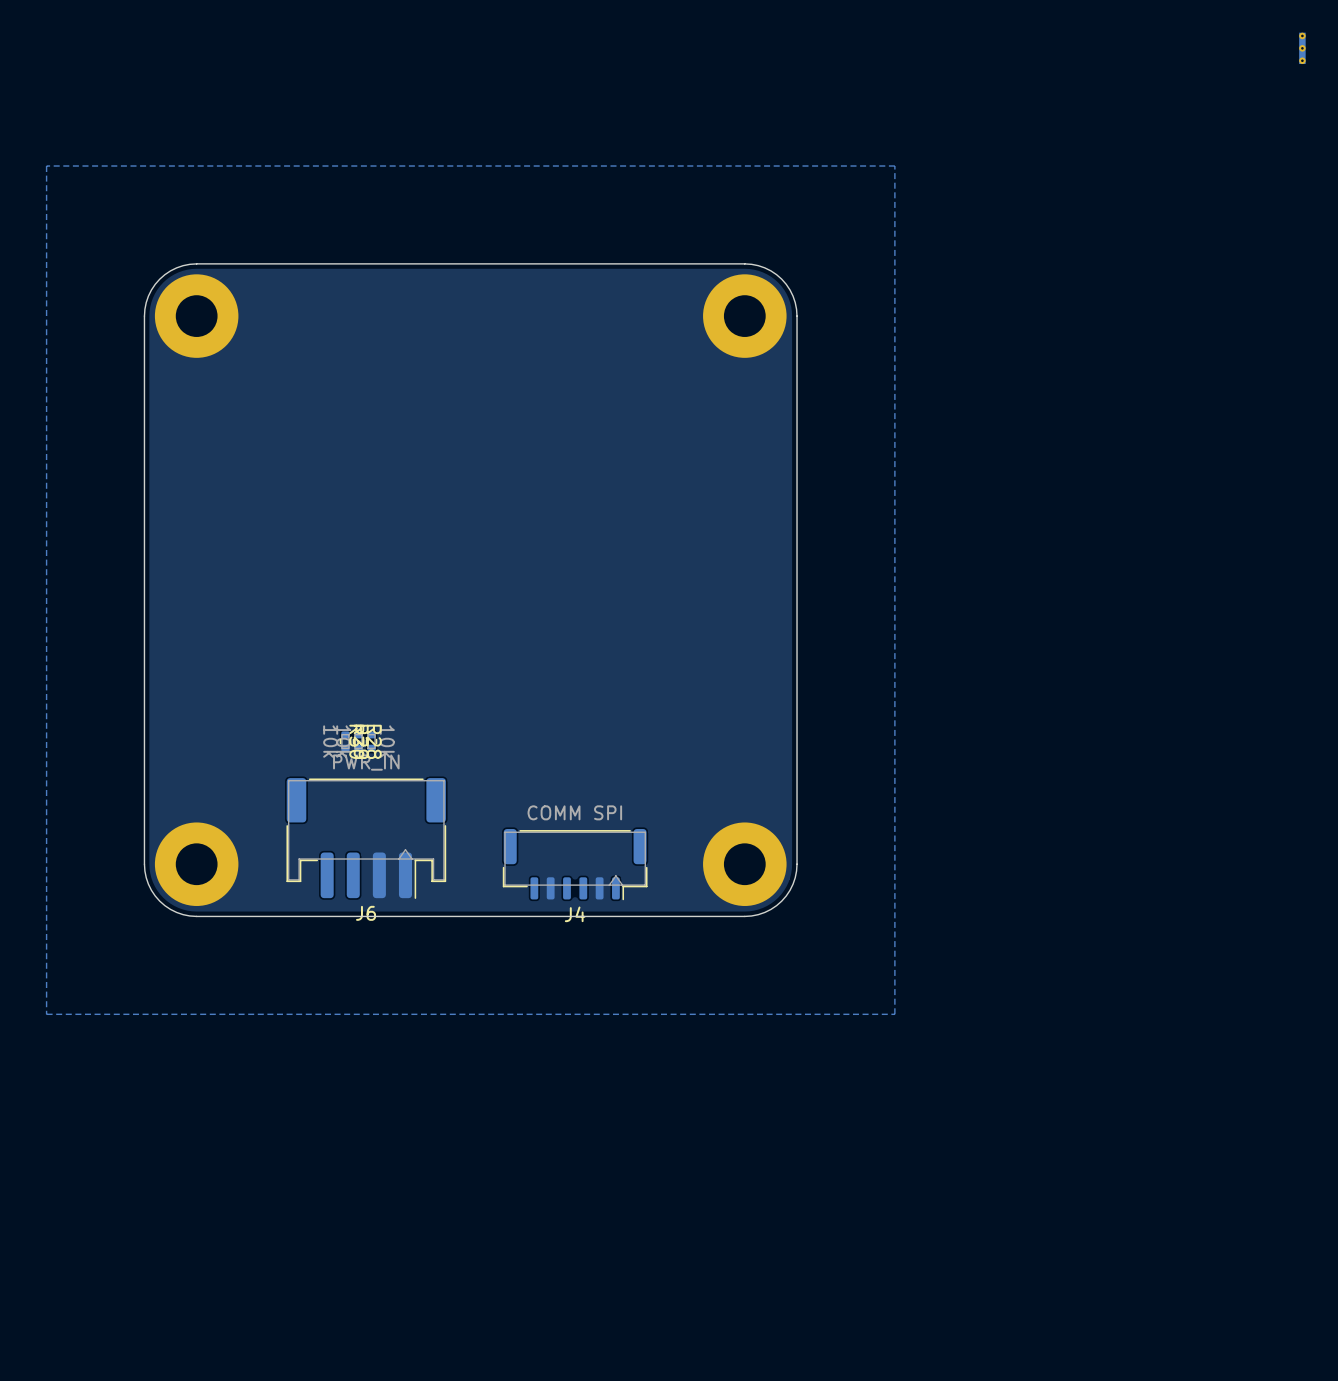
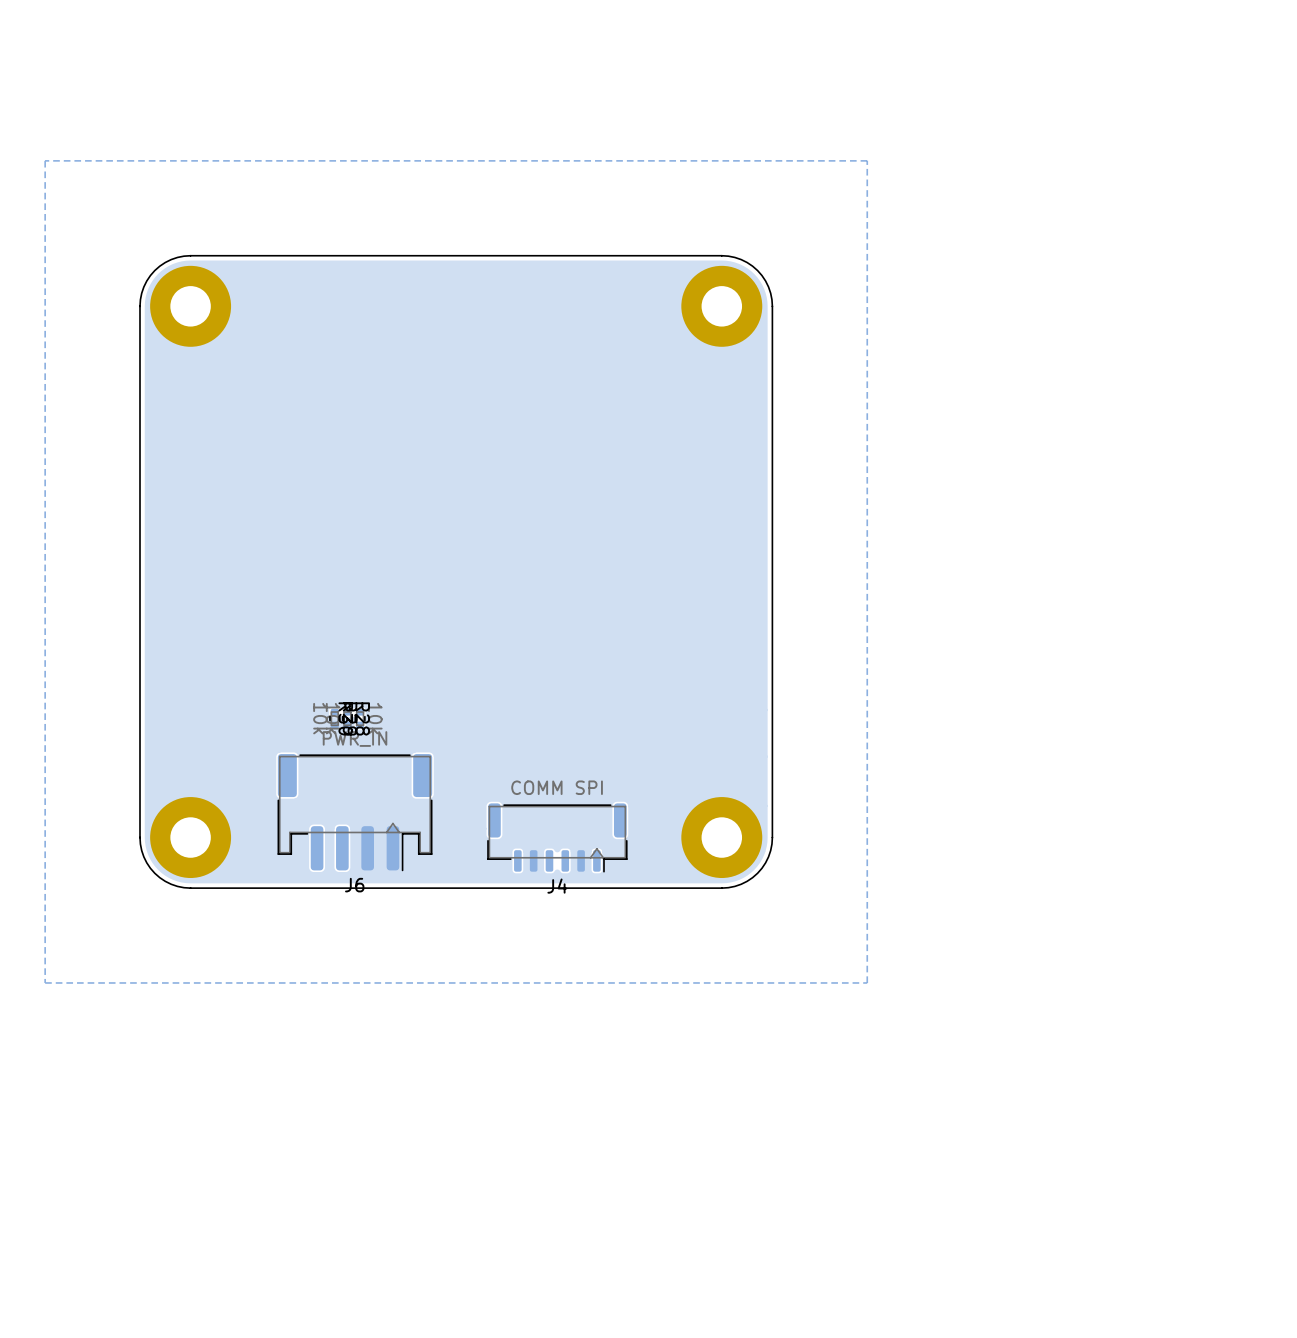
part: (1302, 48) -> none

